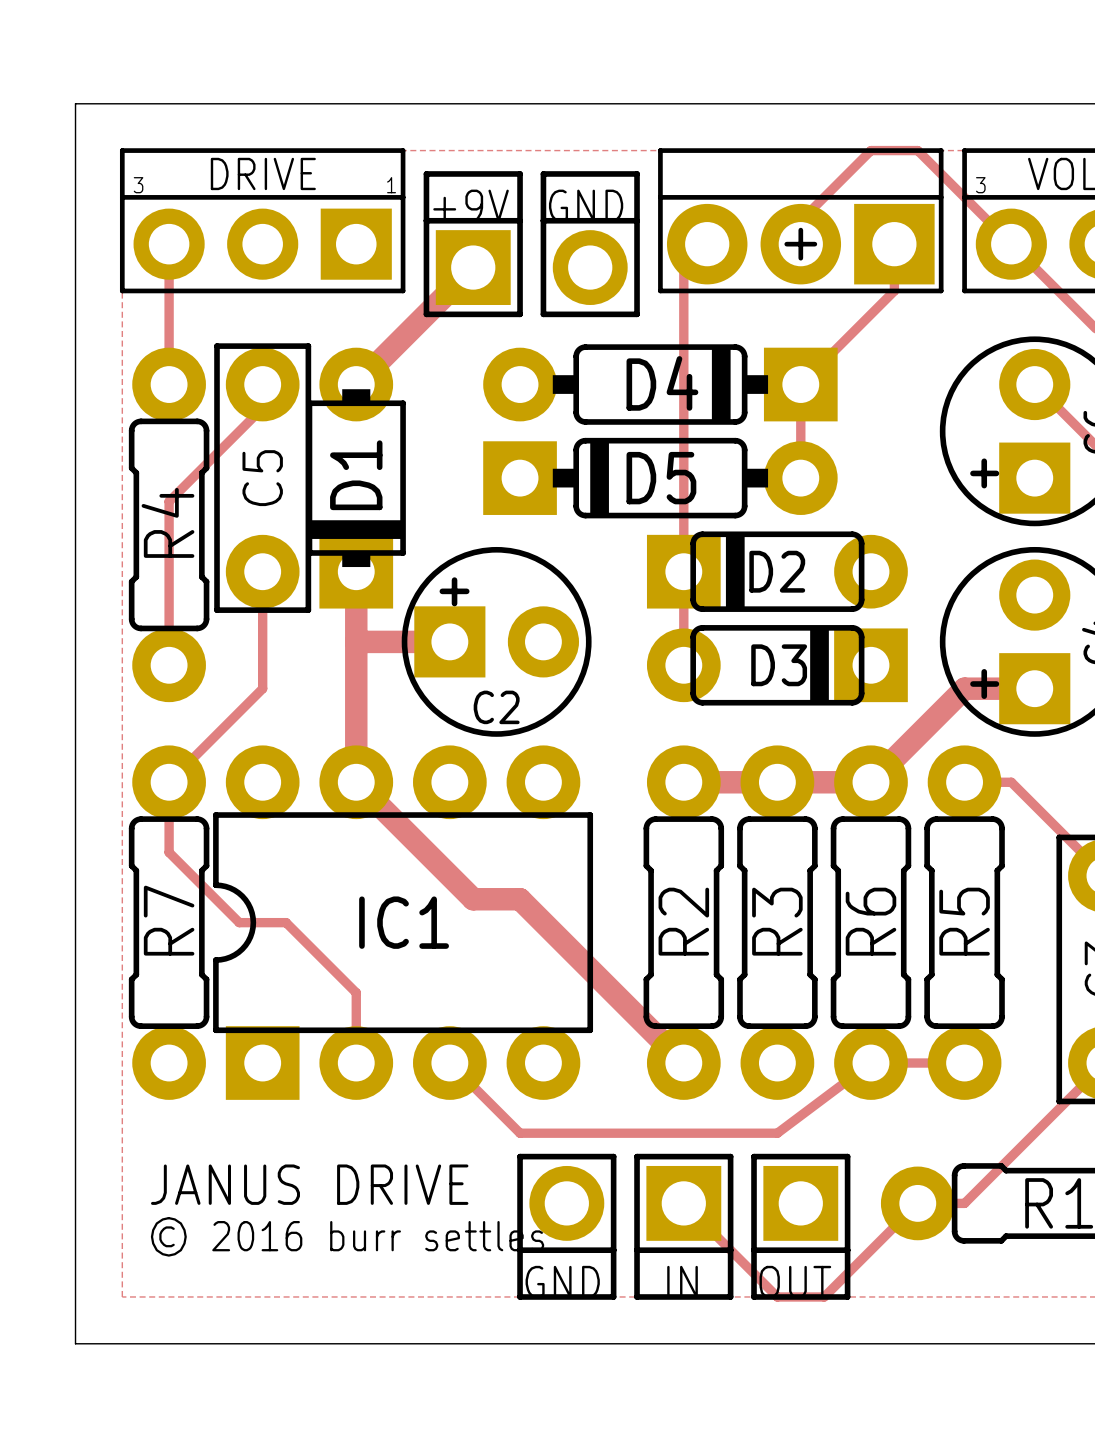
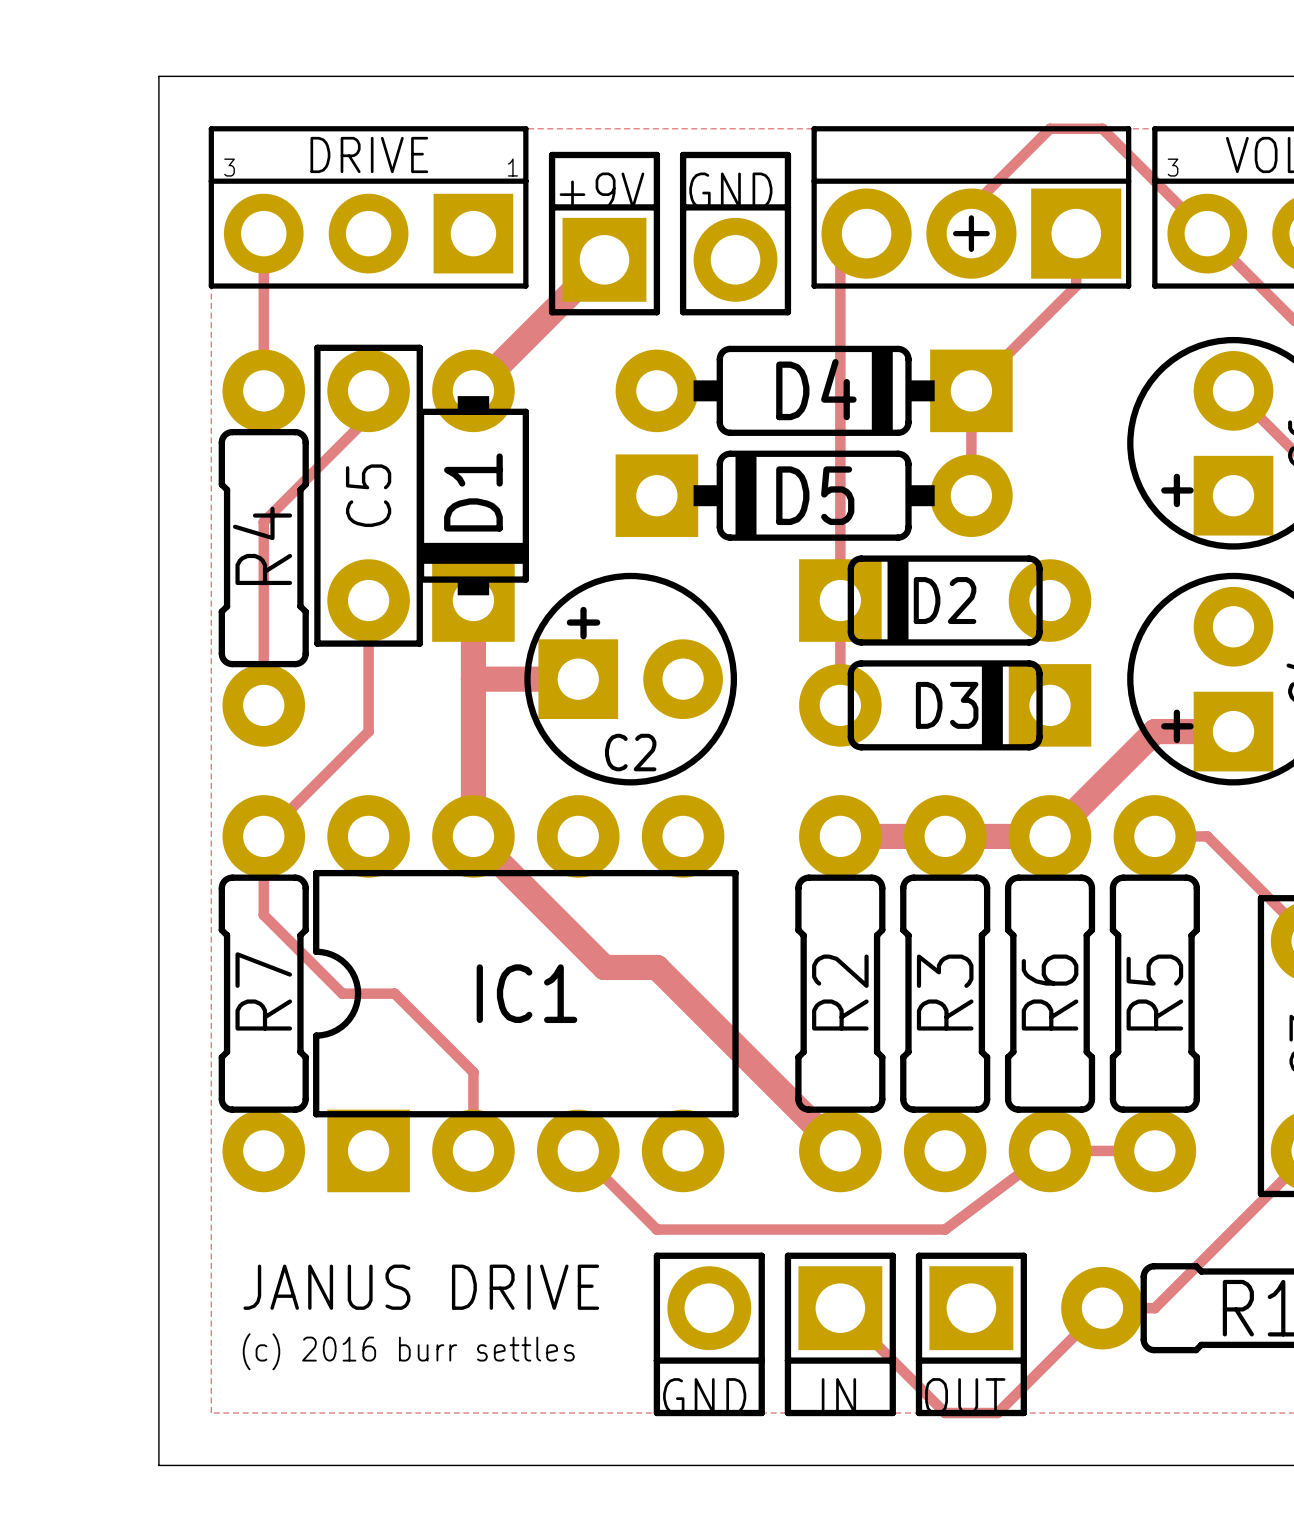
text: © 2016 burr settles (347, 1236) -> (c) 2016 burr settles (408, 1351)

